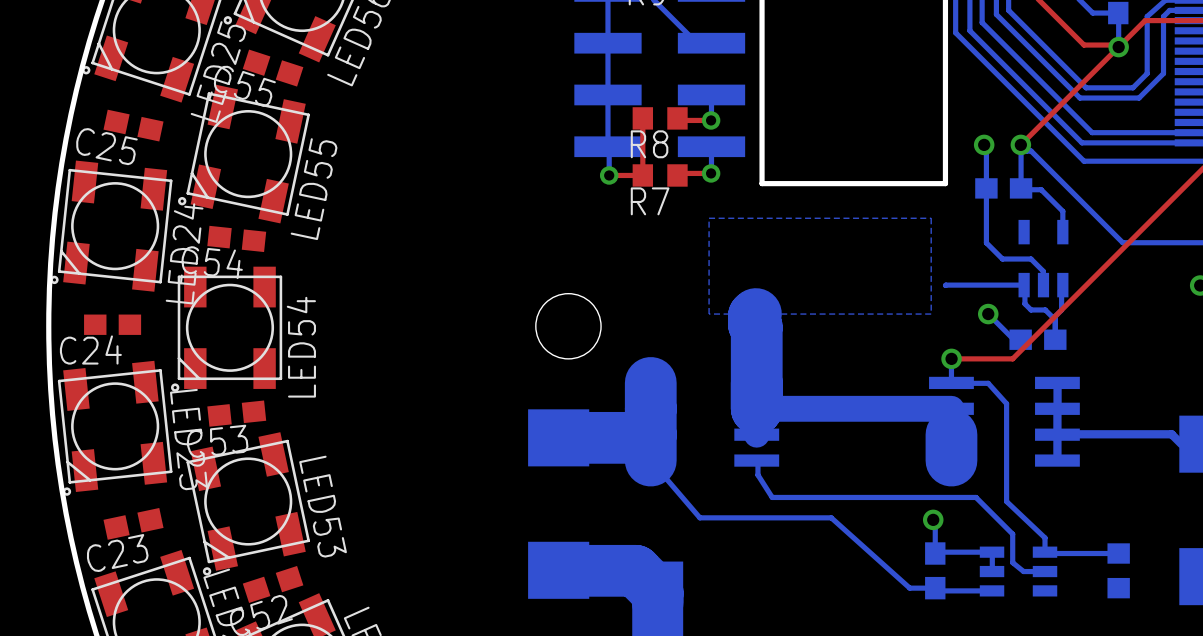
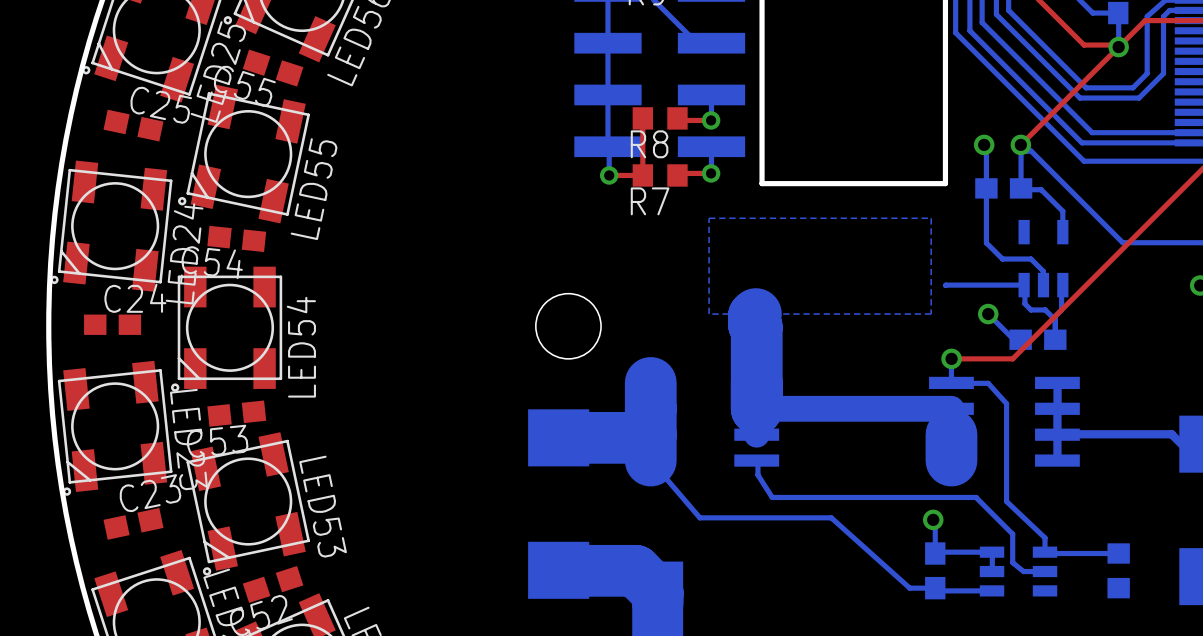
C25 name position: C25 (106, 146) -> C25 (161, 105)
C24 name position: C24 (90, 350) -> C24 (135, 298)
C23 name position: C23 (117, 553) -> C23 (150, 493)

